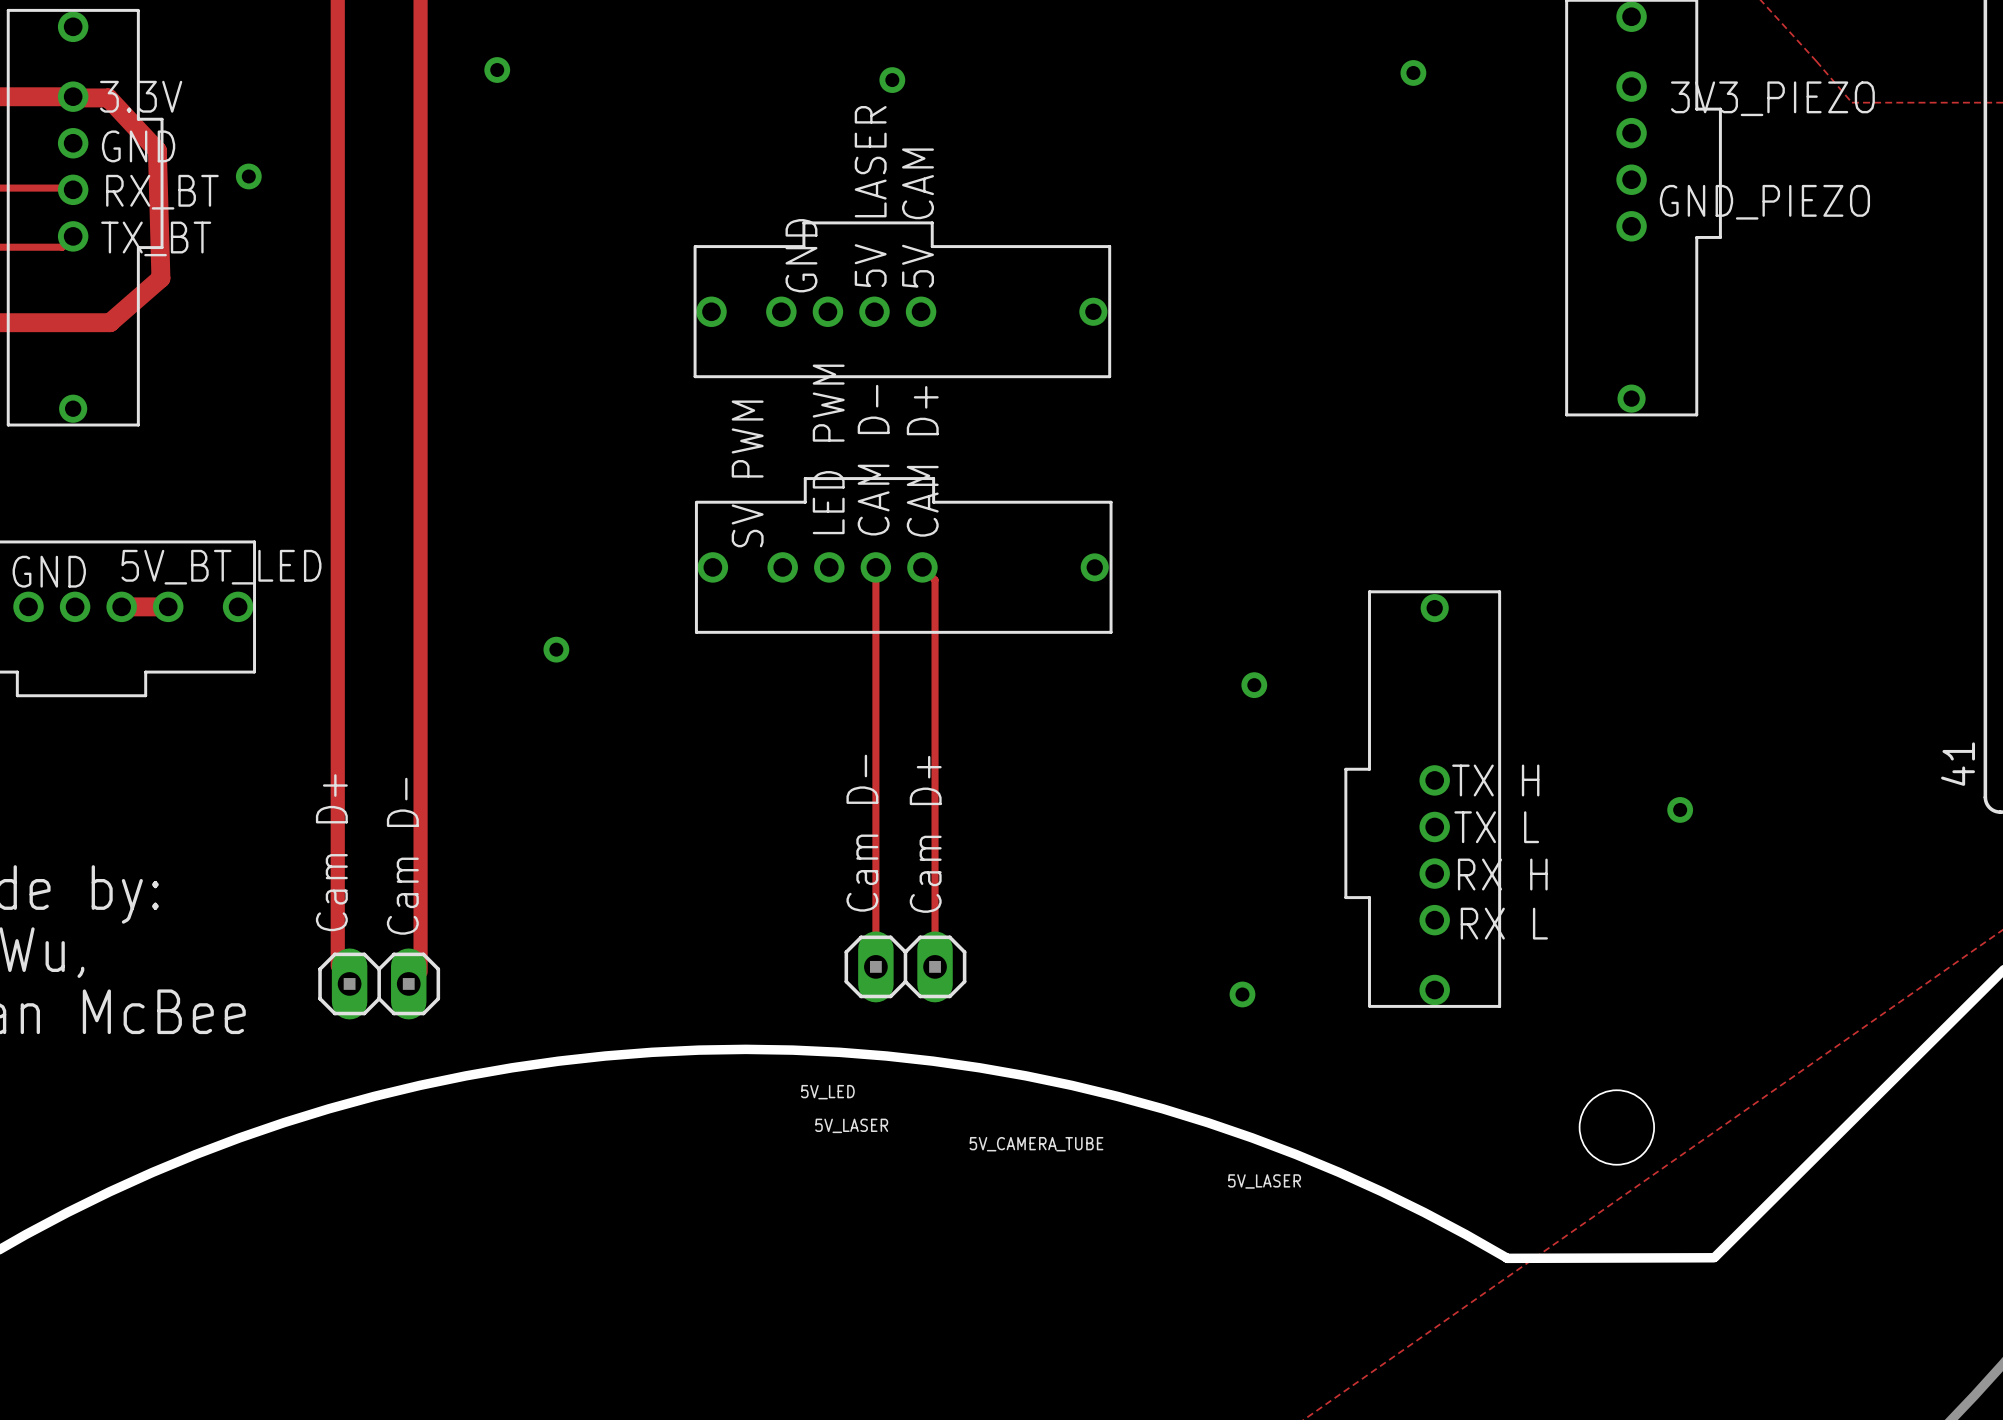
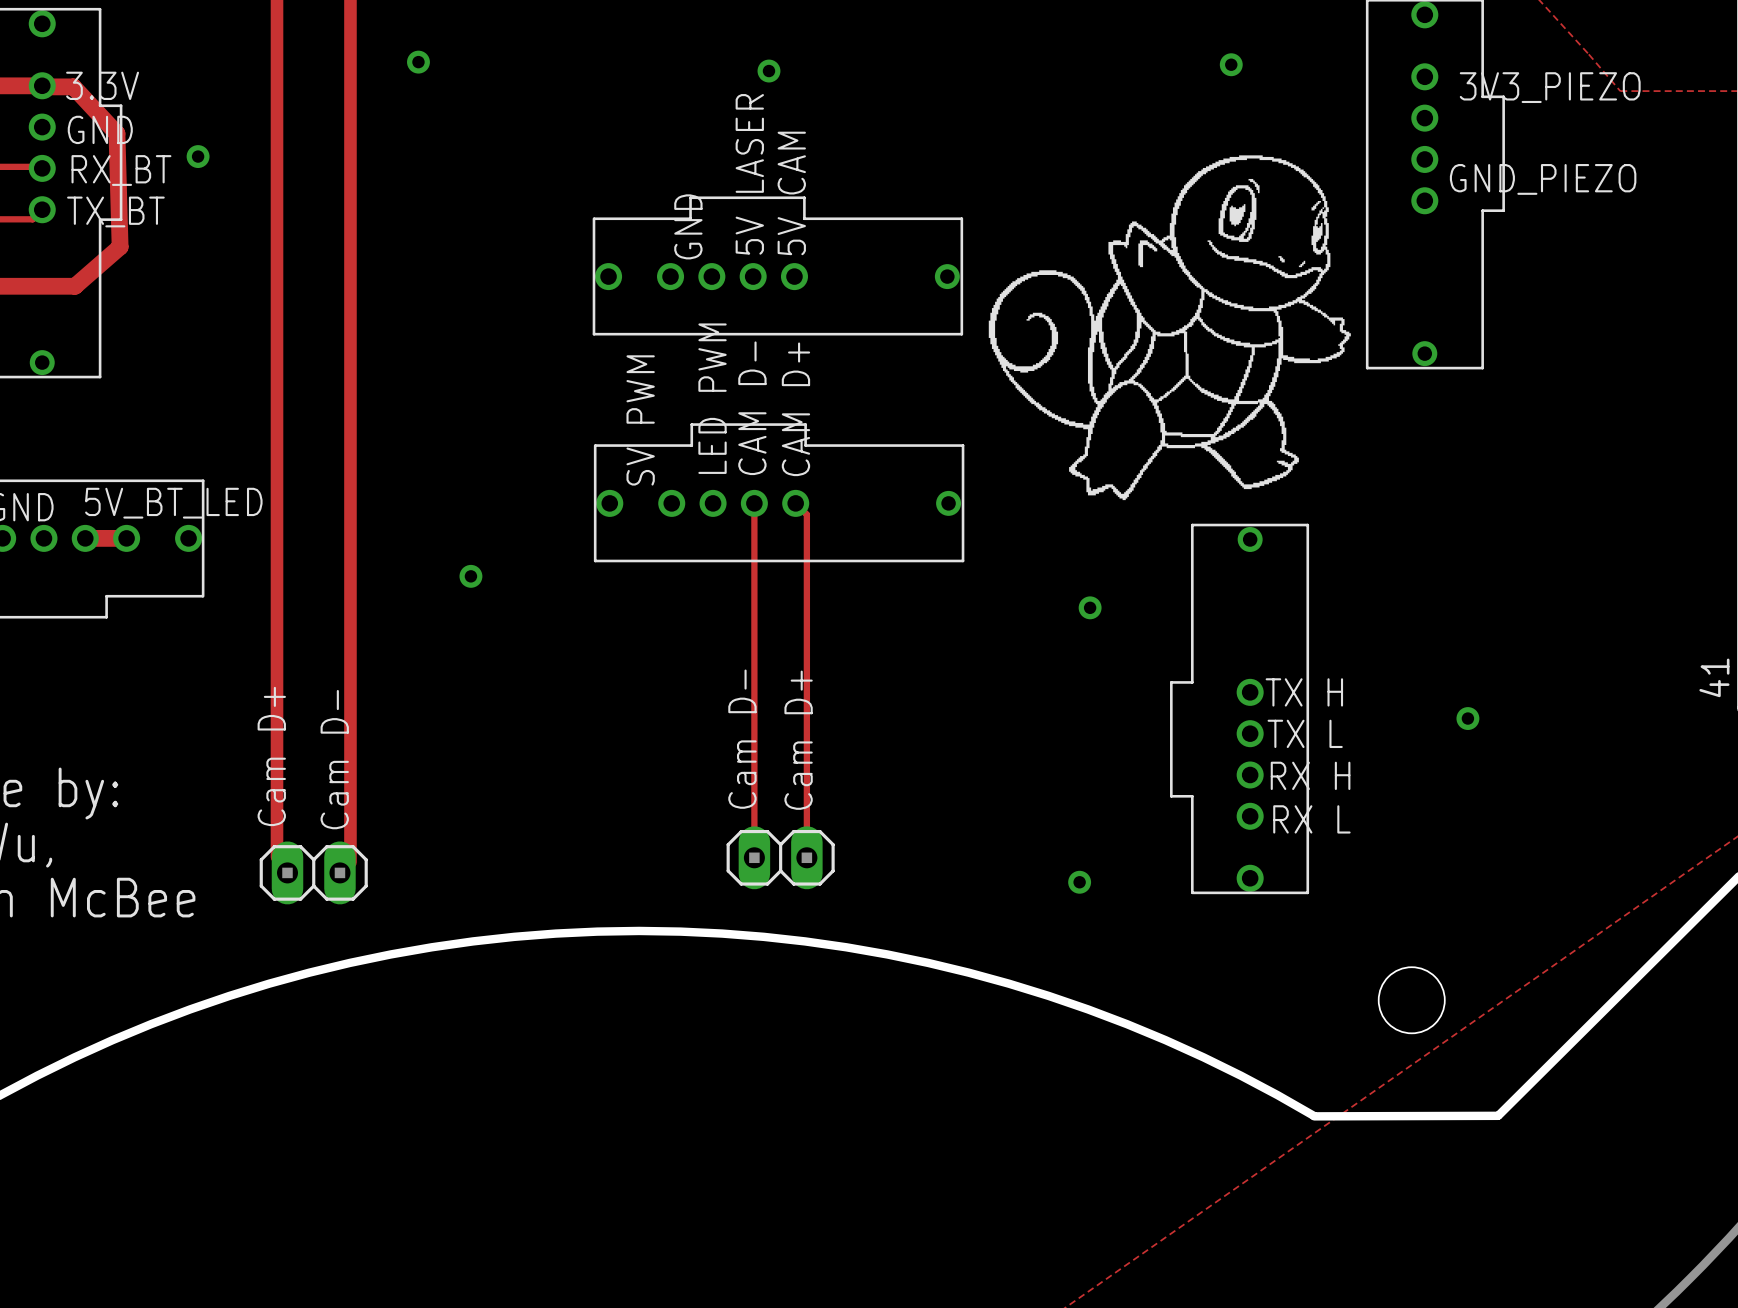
drawing: none -> [988, 155, 1351, 501]
text: 5V_LED (827, 1092) -> none
text: 5V_LASER (851, 1125) -> none
text: 5V_CAMERA_TUBE (1036, 1144) -> none
text: 5V_LASER (1264, 1181) -> none

